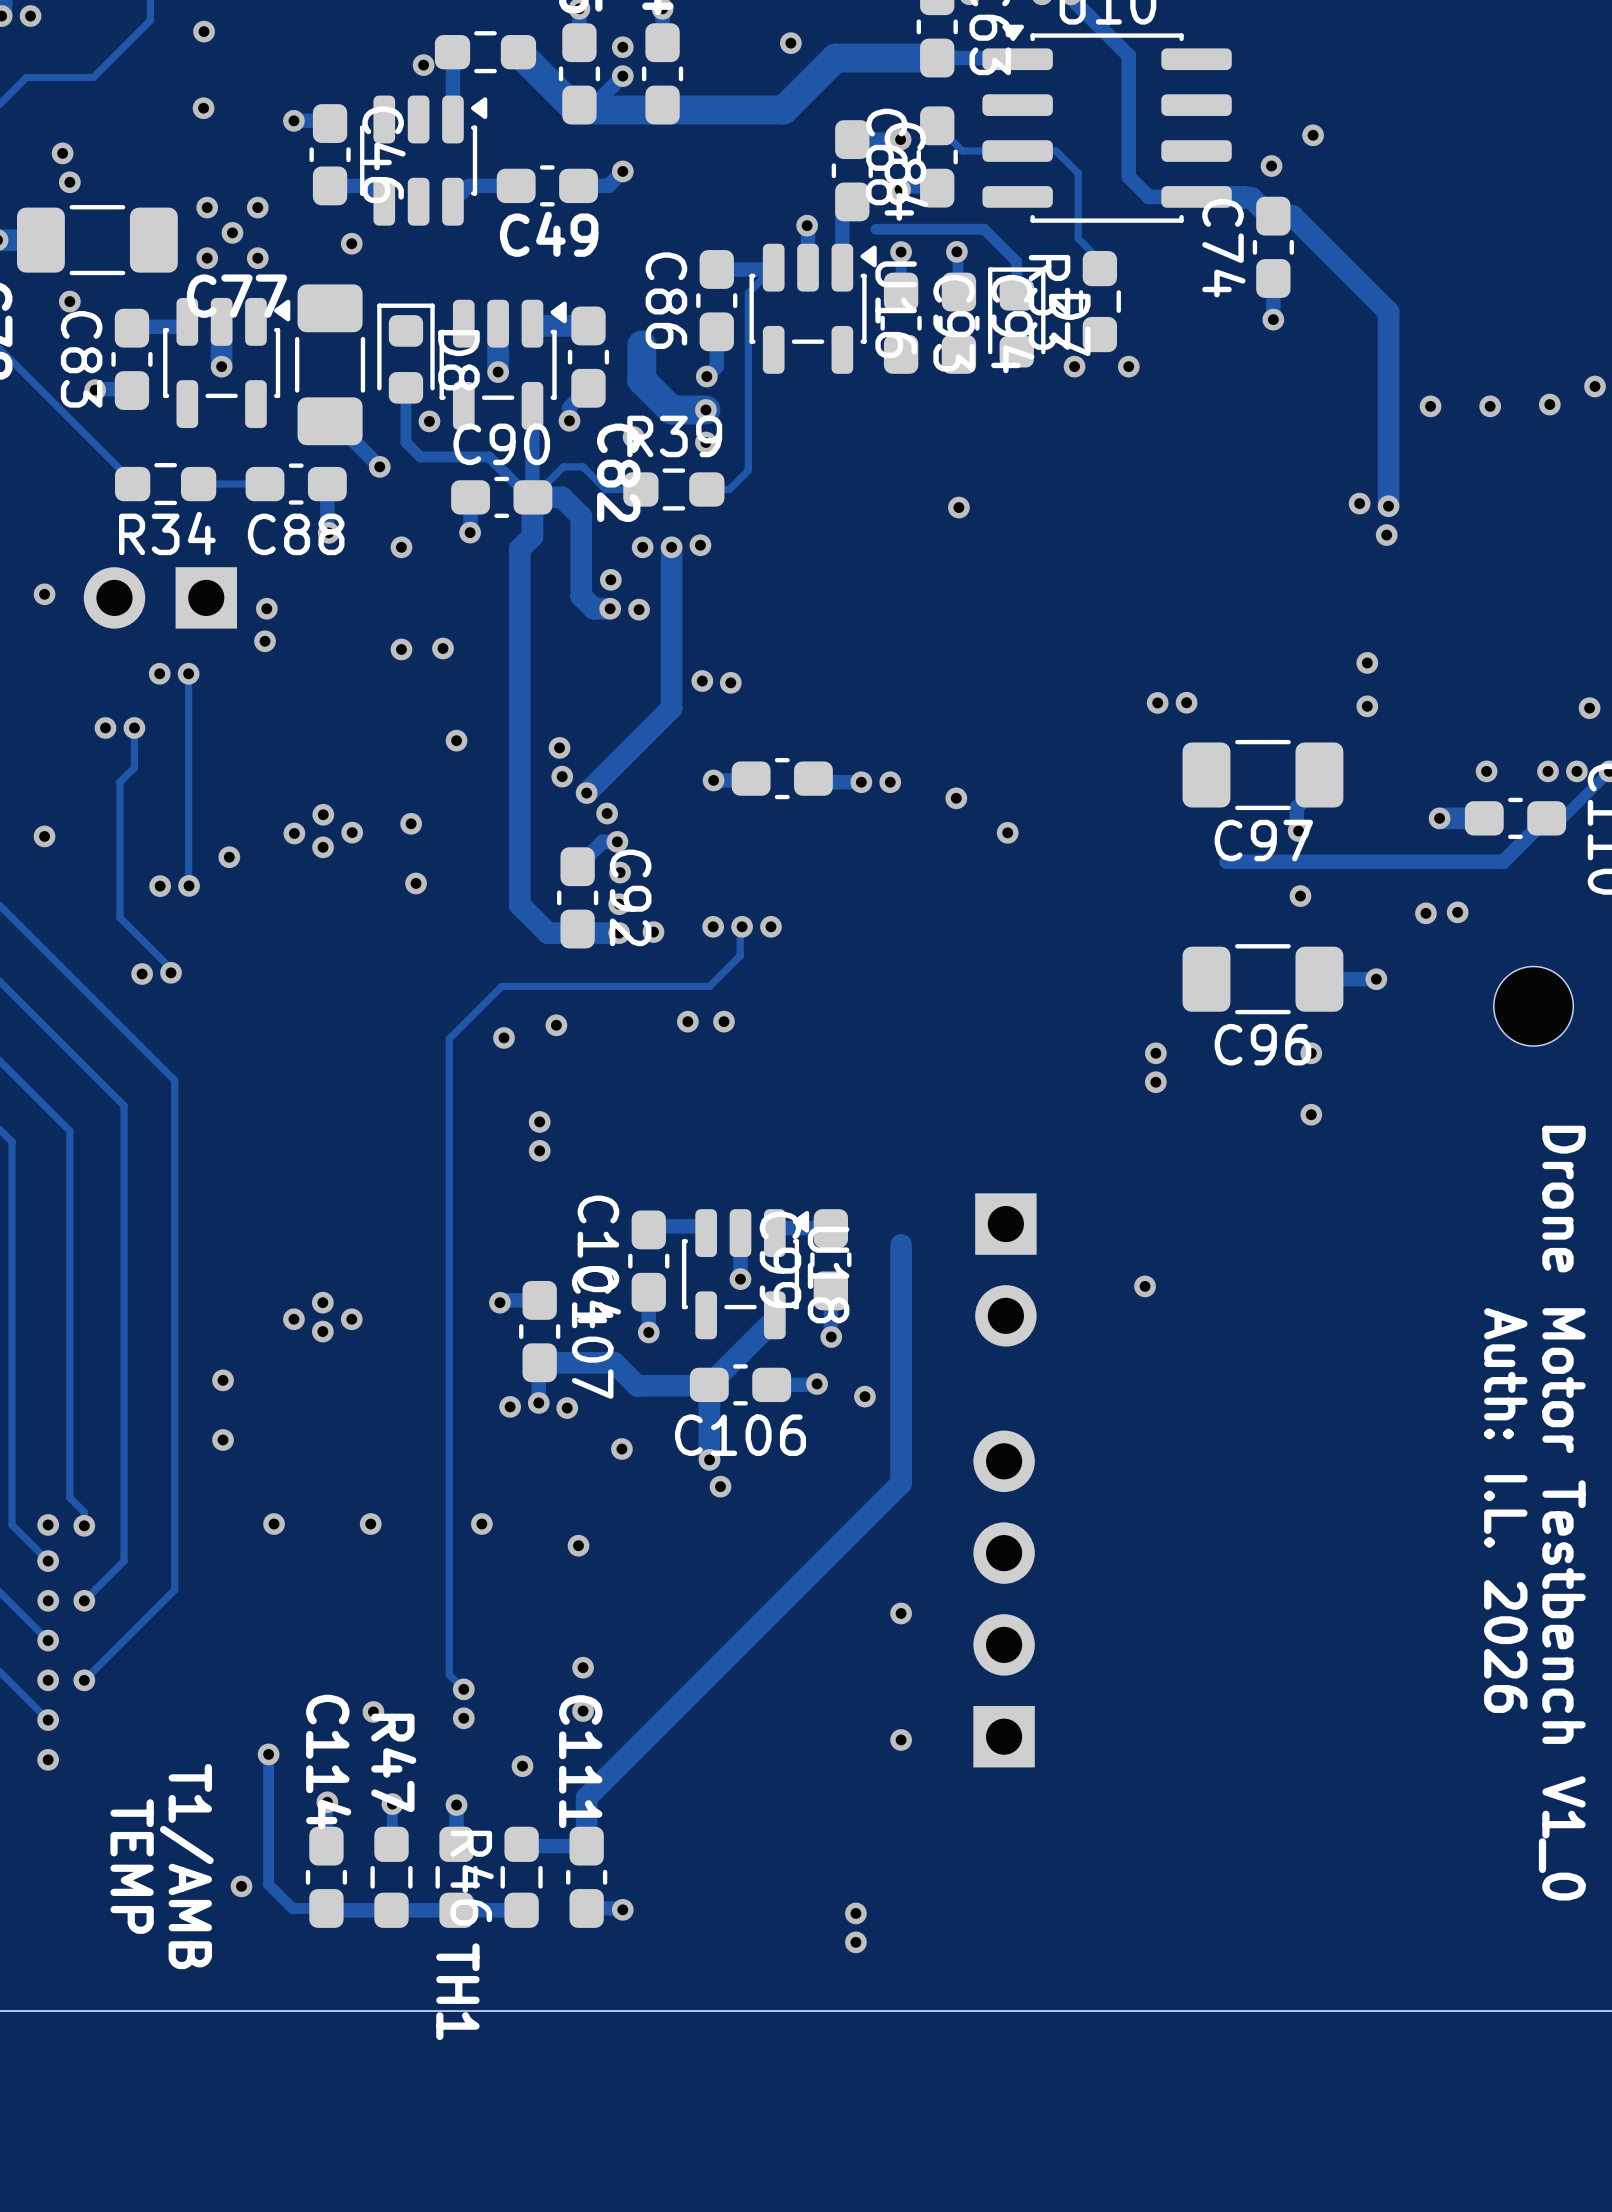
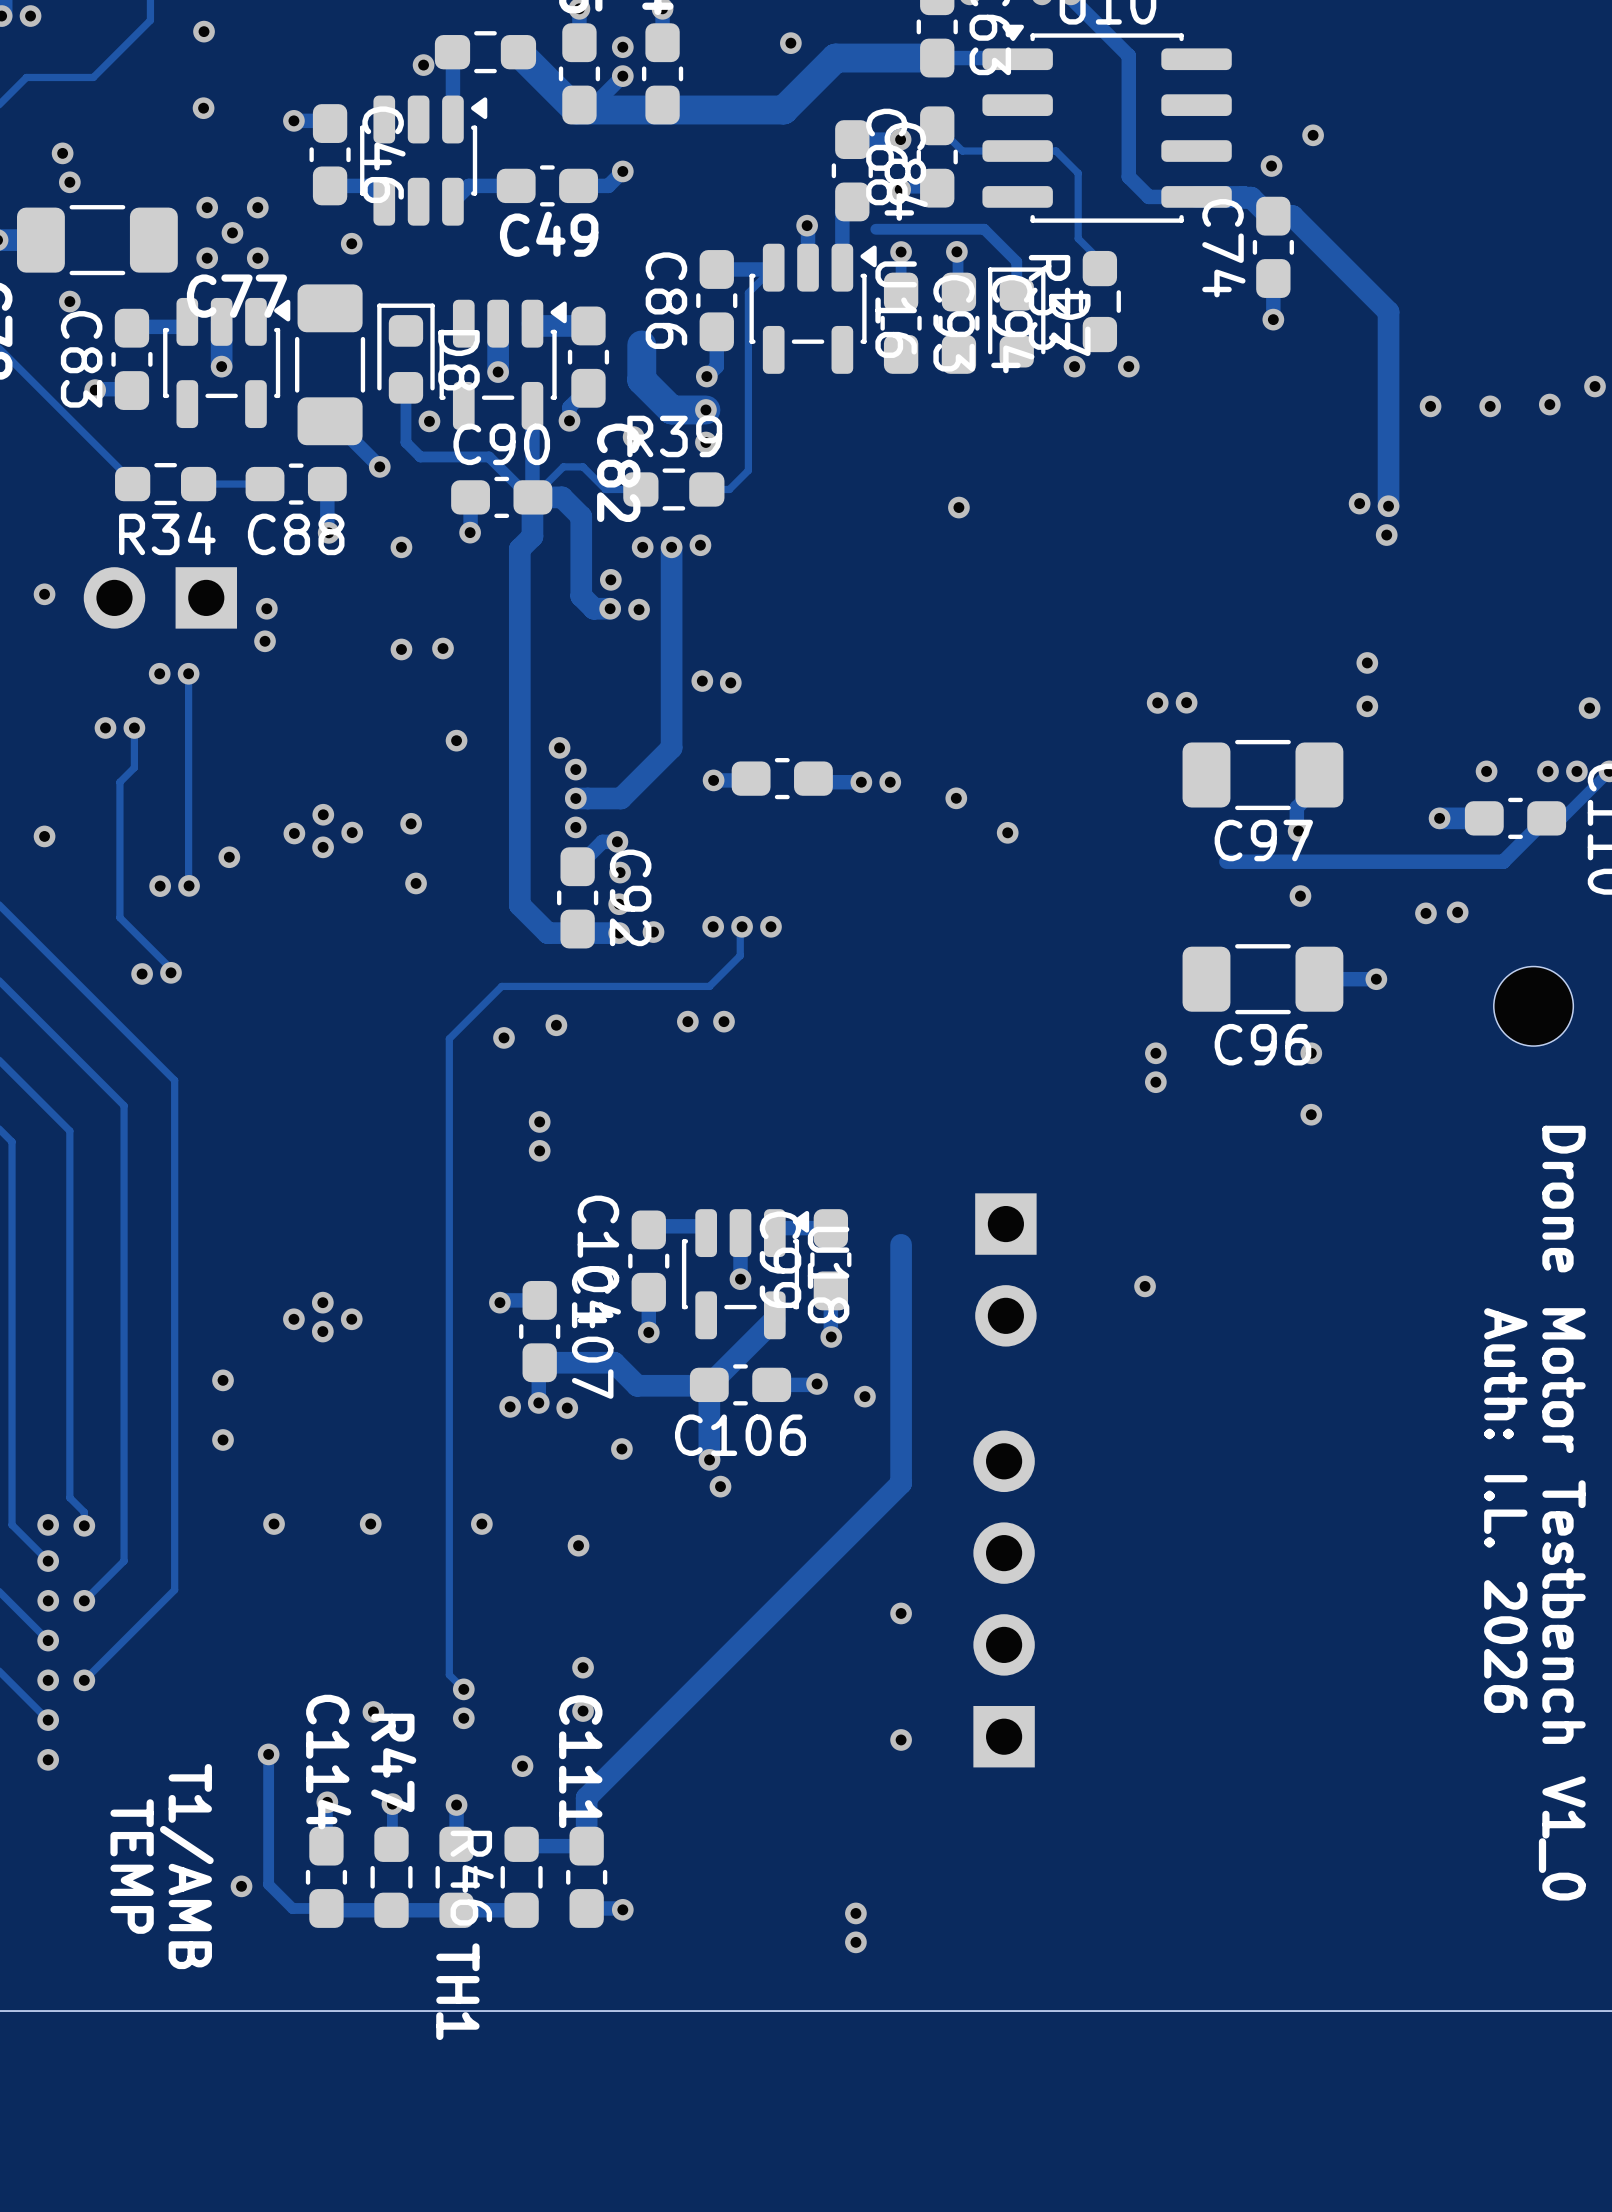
track: (671, 708) (586, 793) -> (671, 708) (671, 747) (621, 798) (575, 798)
via position: (562, 776) -> (575, 769)
via position: (586, 793) -> (575, 798)
via: (607, 813) -> none
via: none -> (575, 827)

